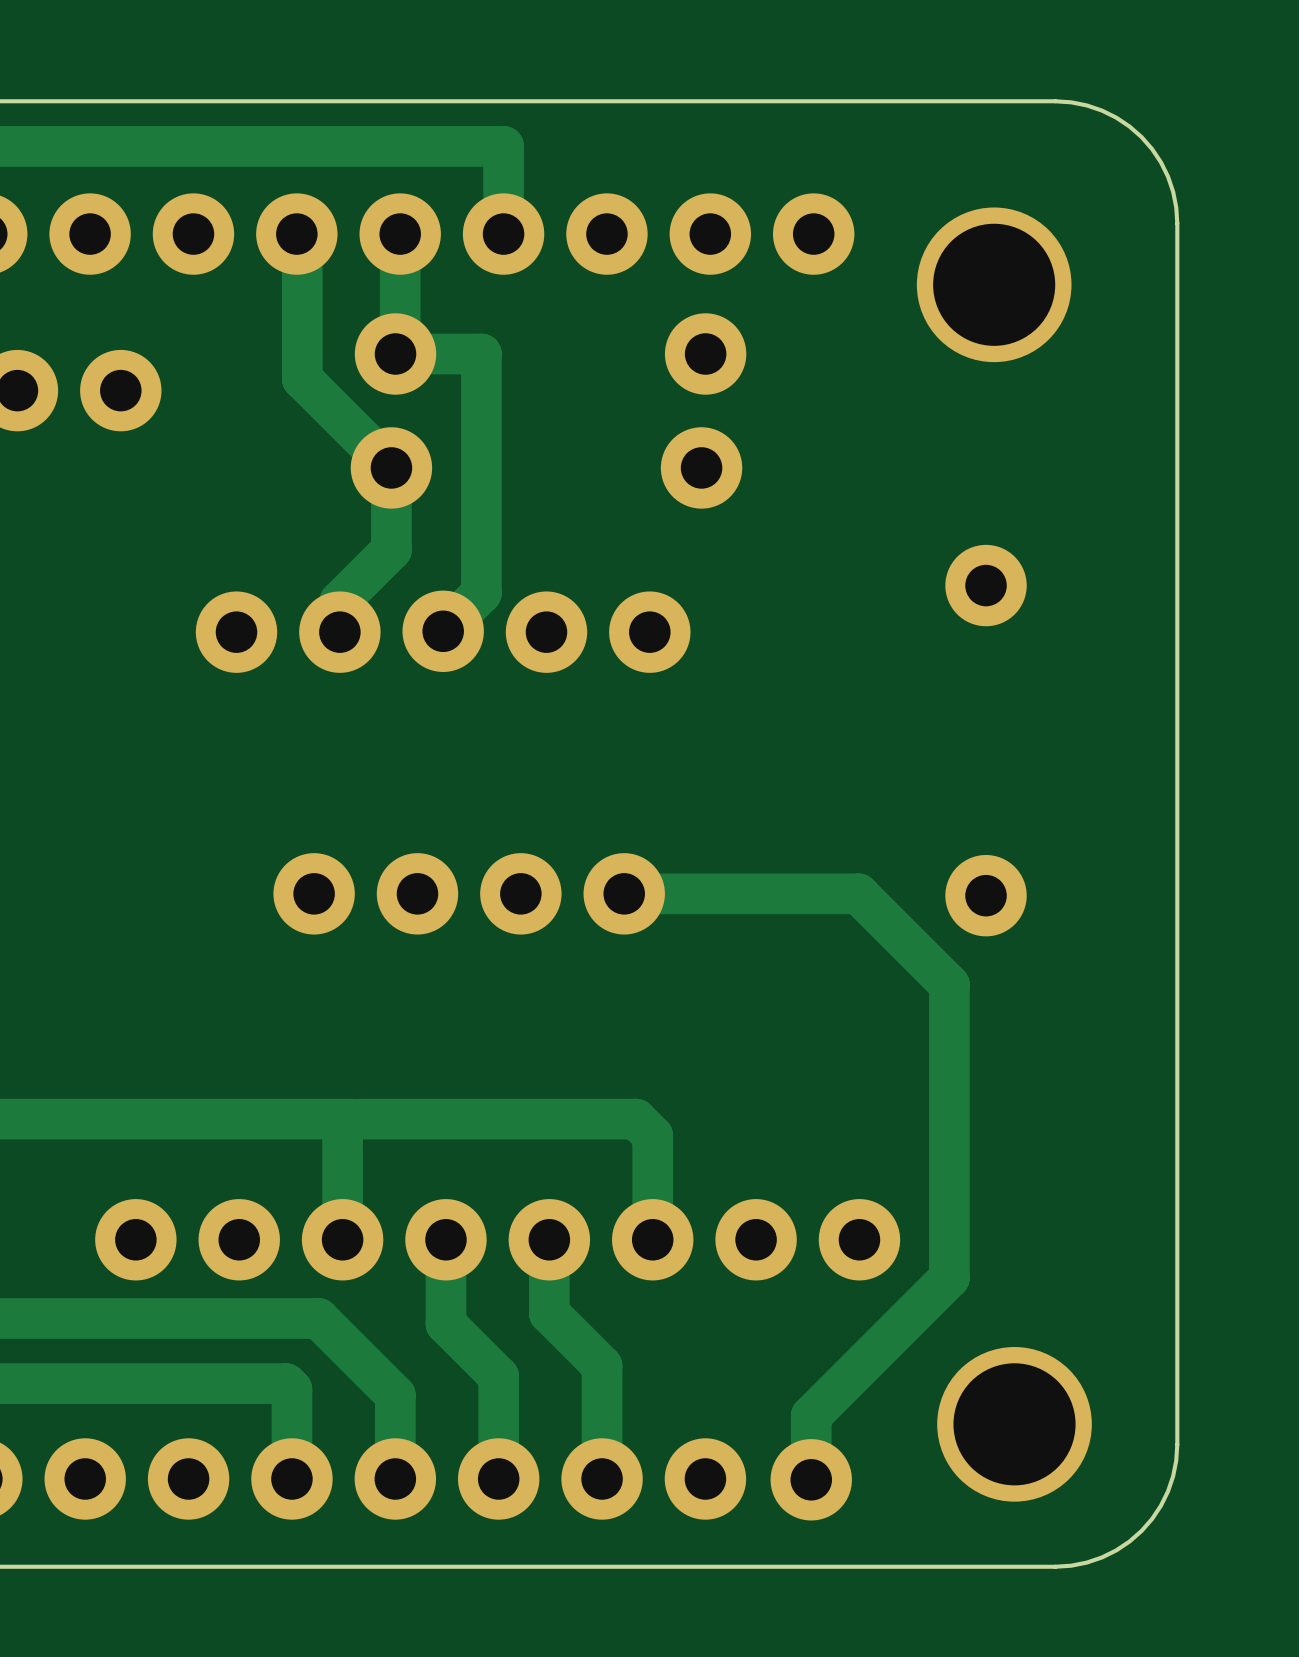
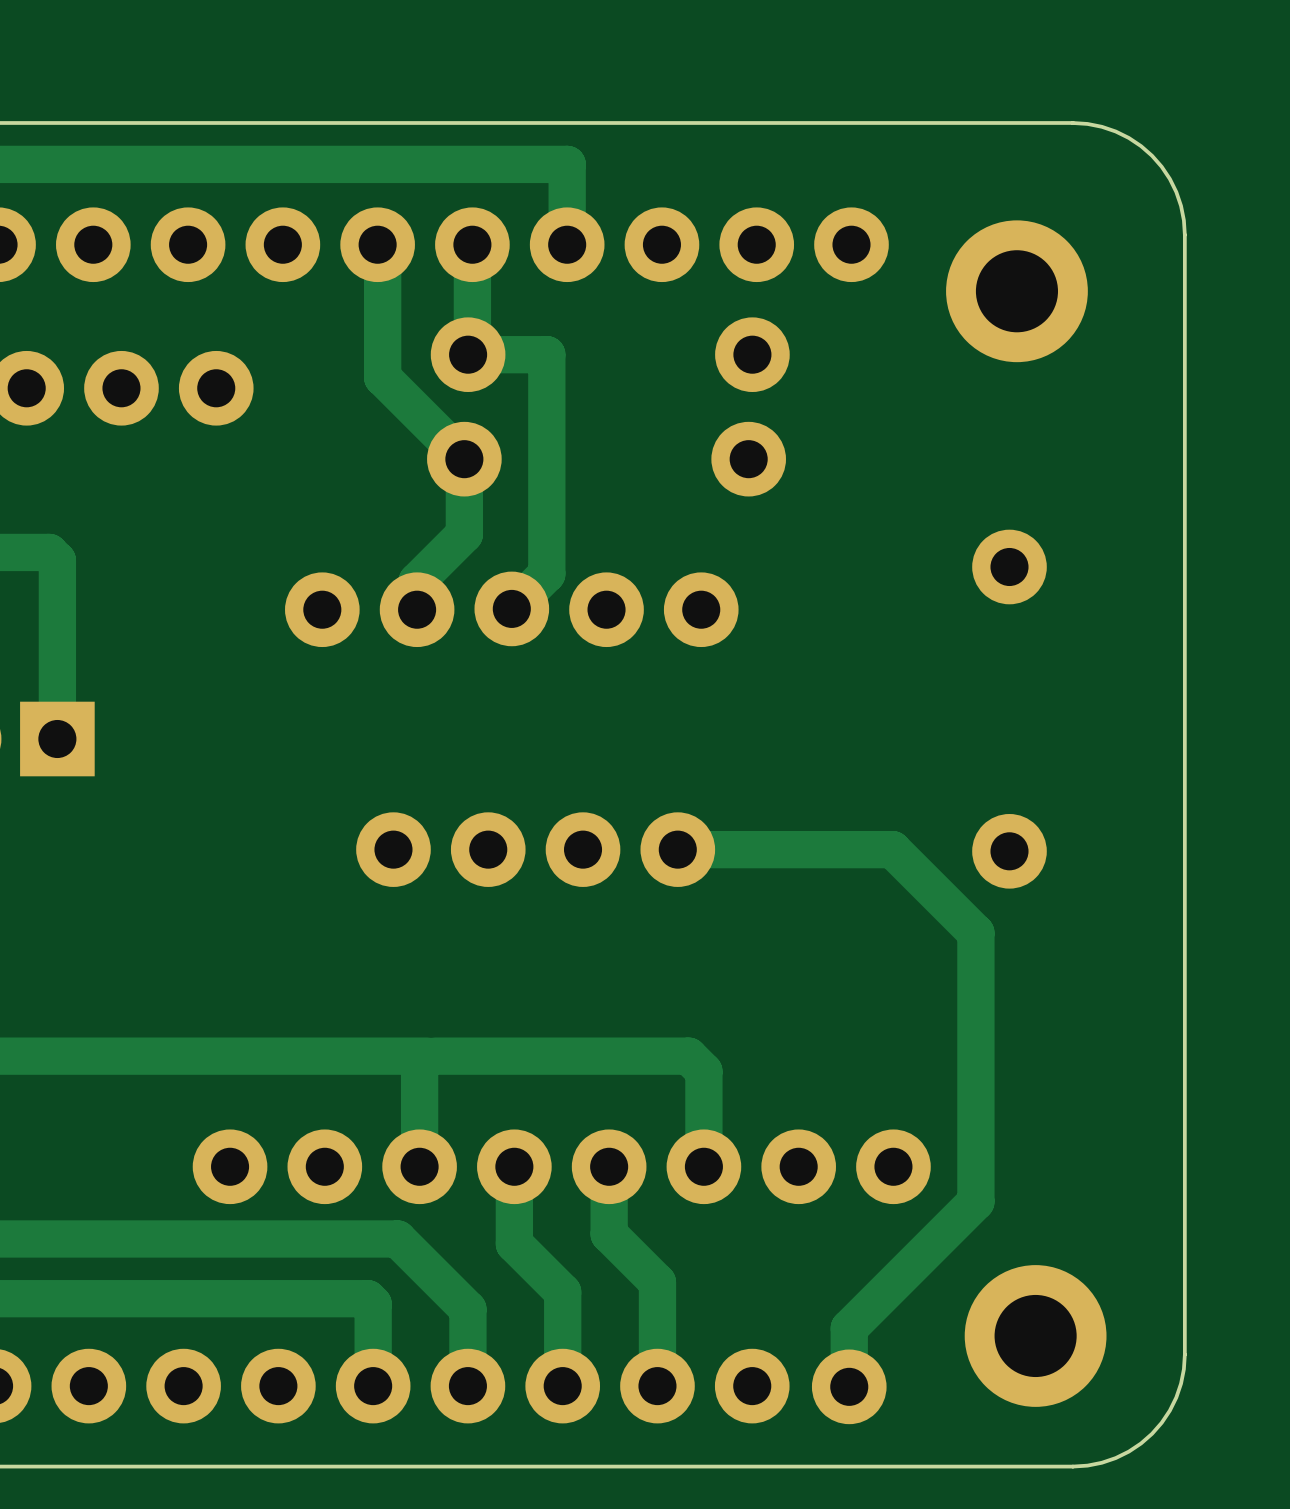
part footprint: [916, 207, 1072, 363] -> [946, 220, 1088, 363]
part footprint: [937, 1347, 1092, 1502] -> [964, 1265, 1107, 1407]

